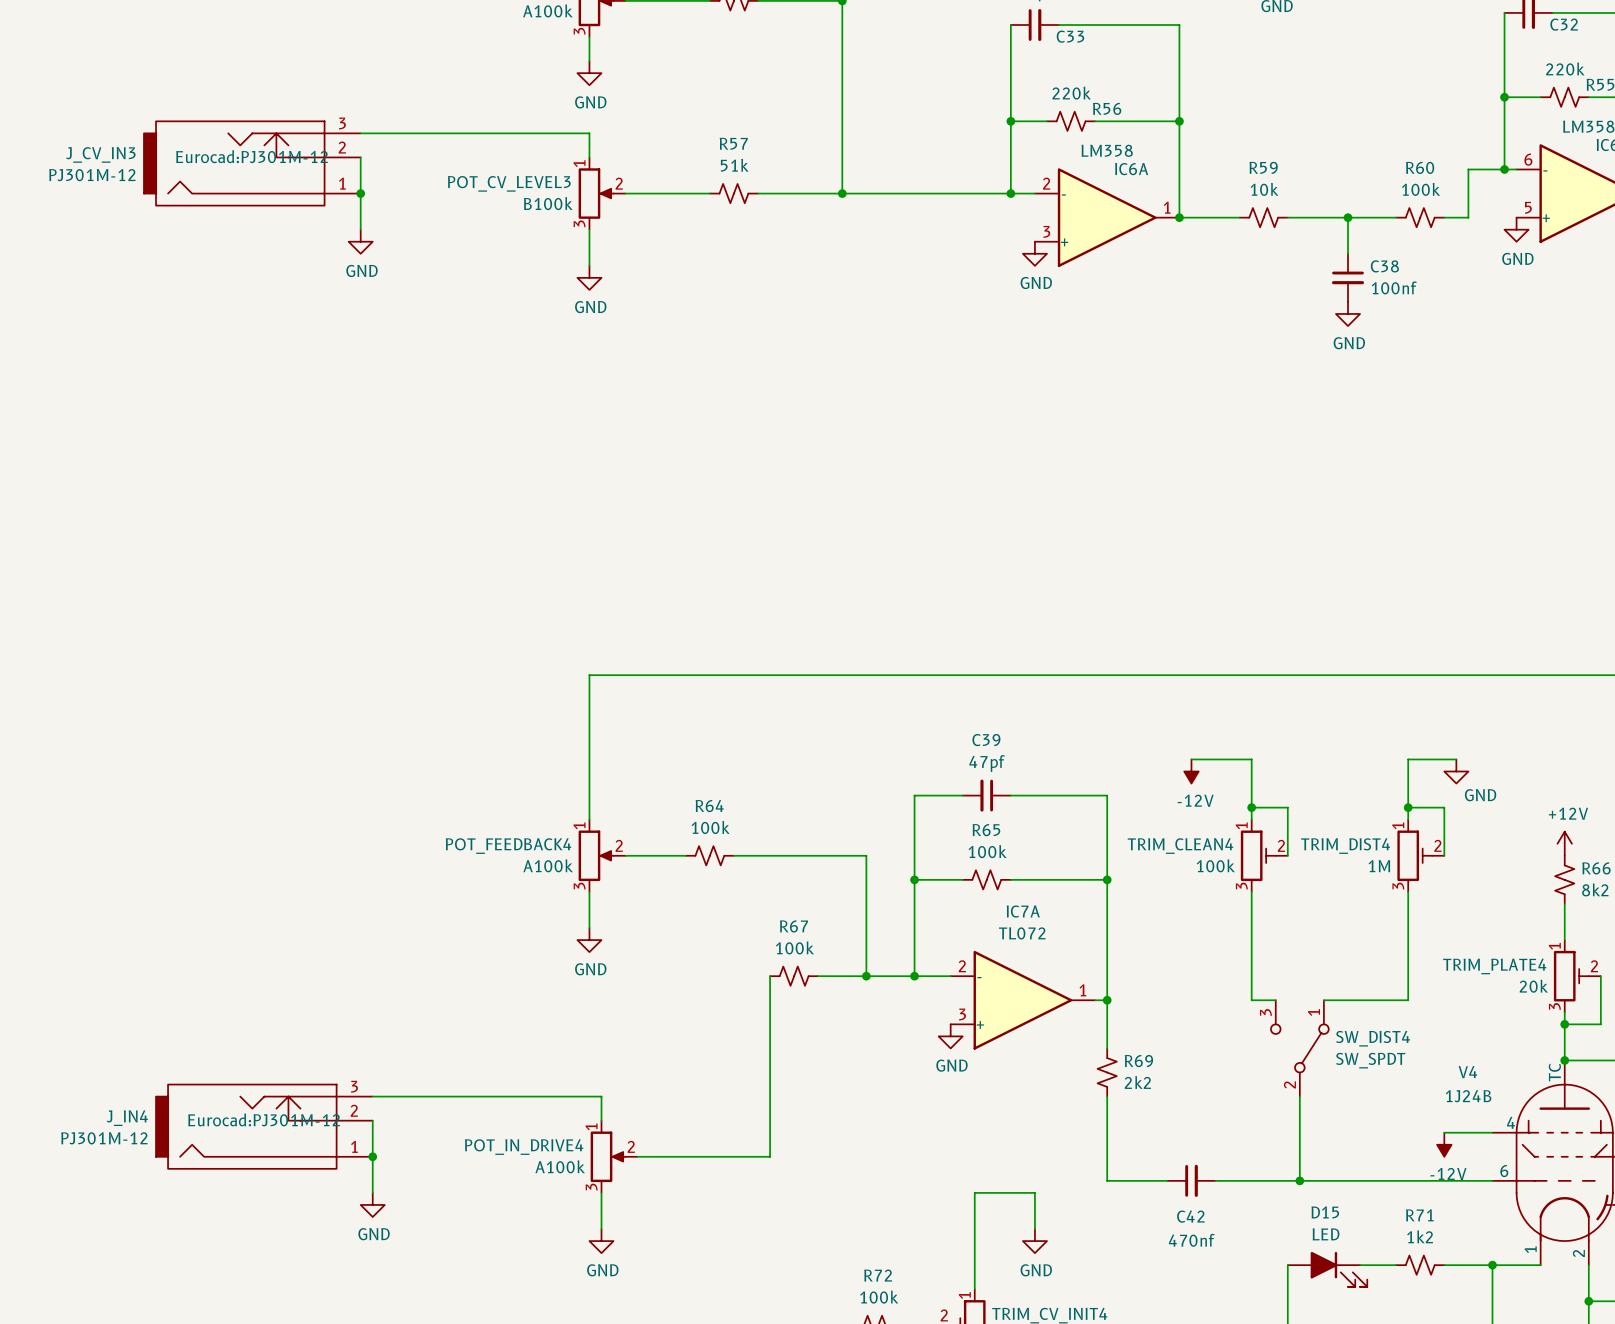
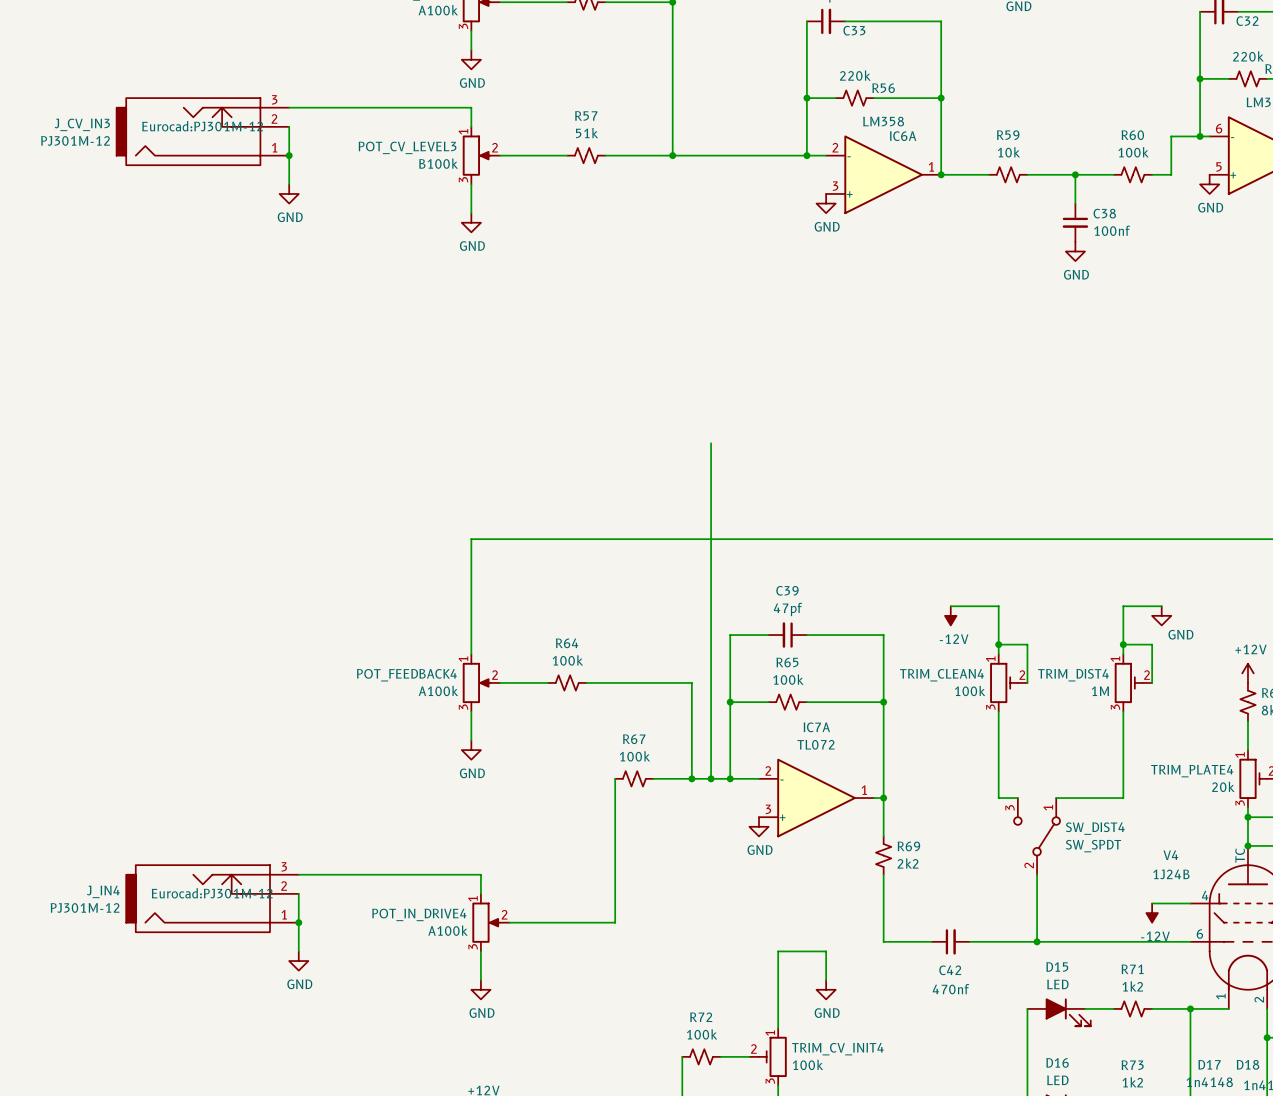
wire: none -> (711, 443) (711, 778)
junction: none -> (711, 778)

